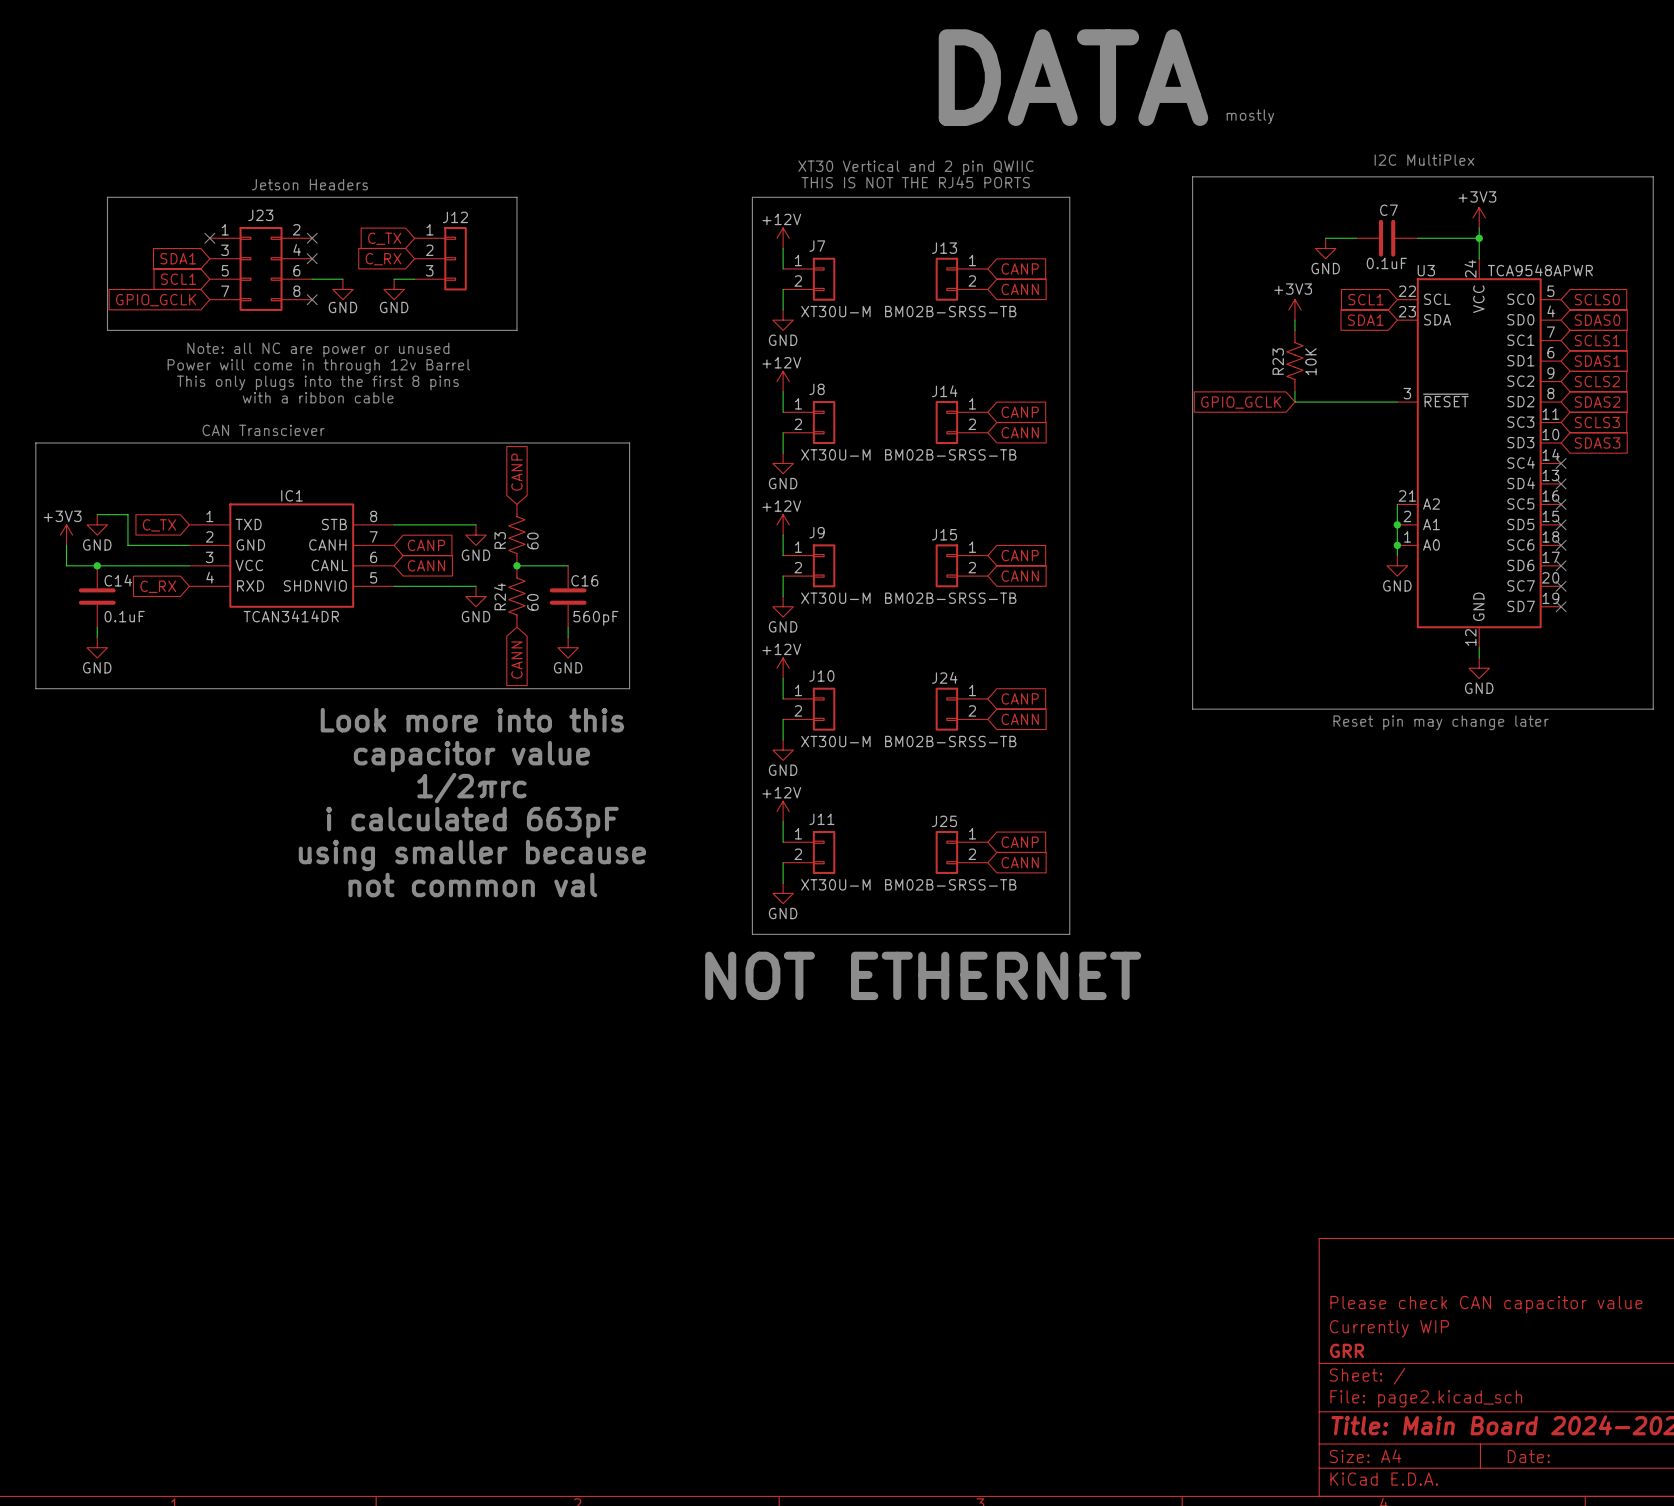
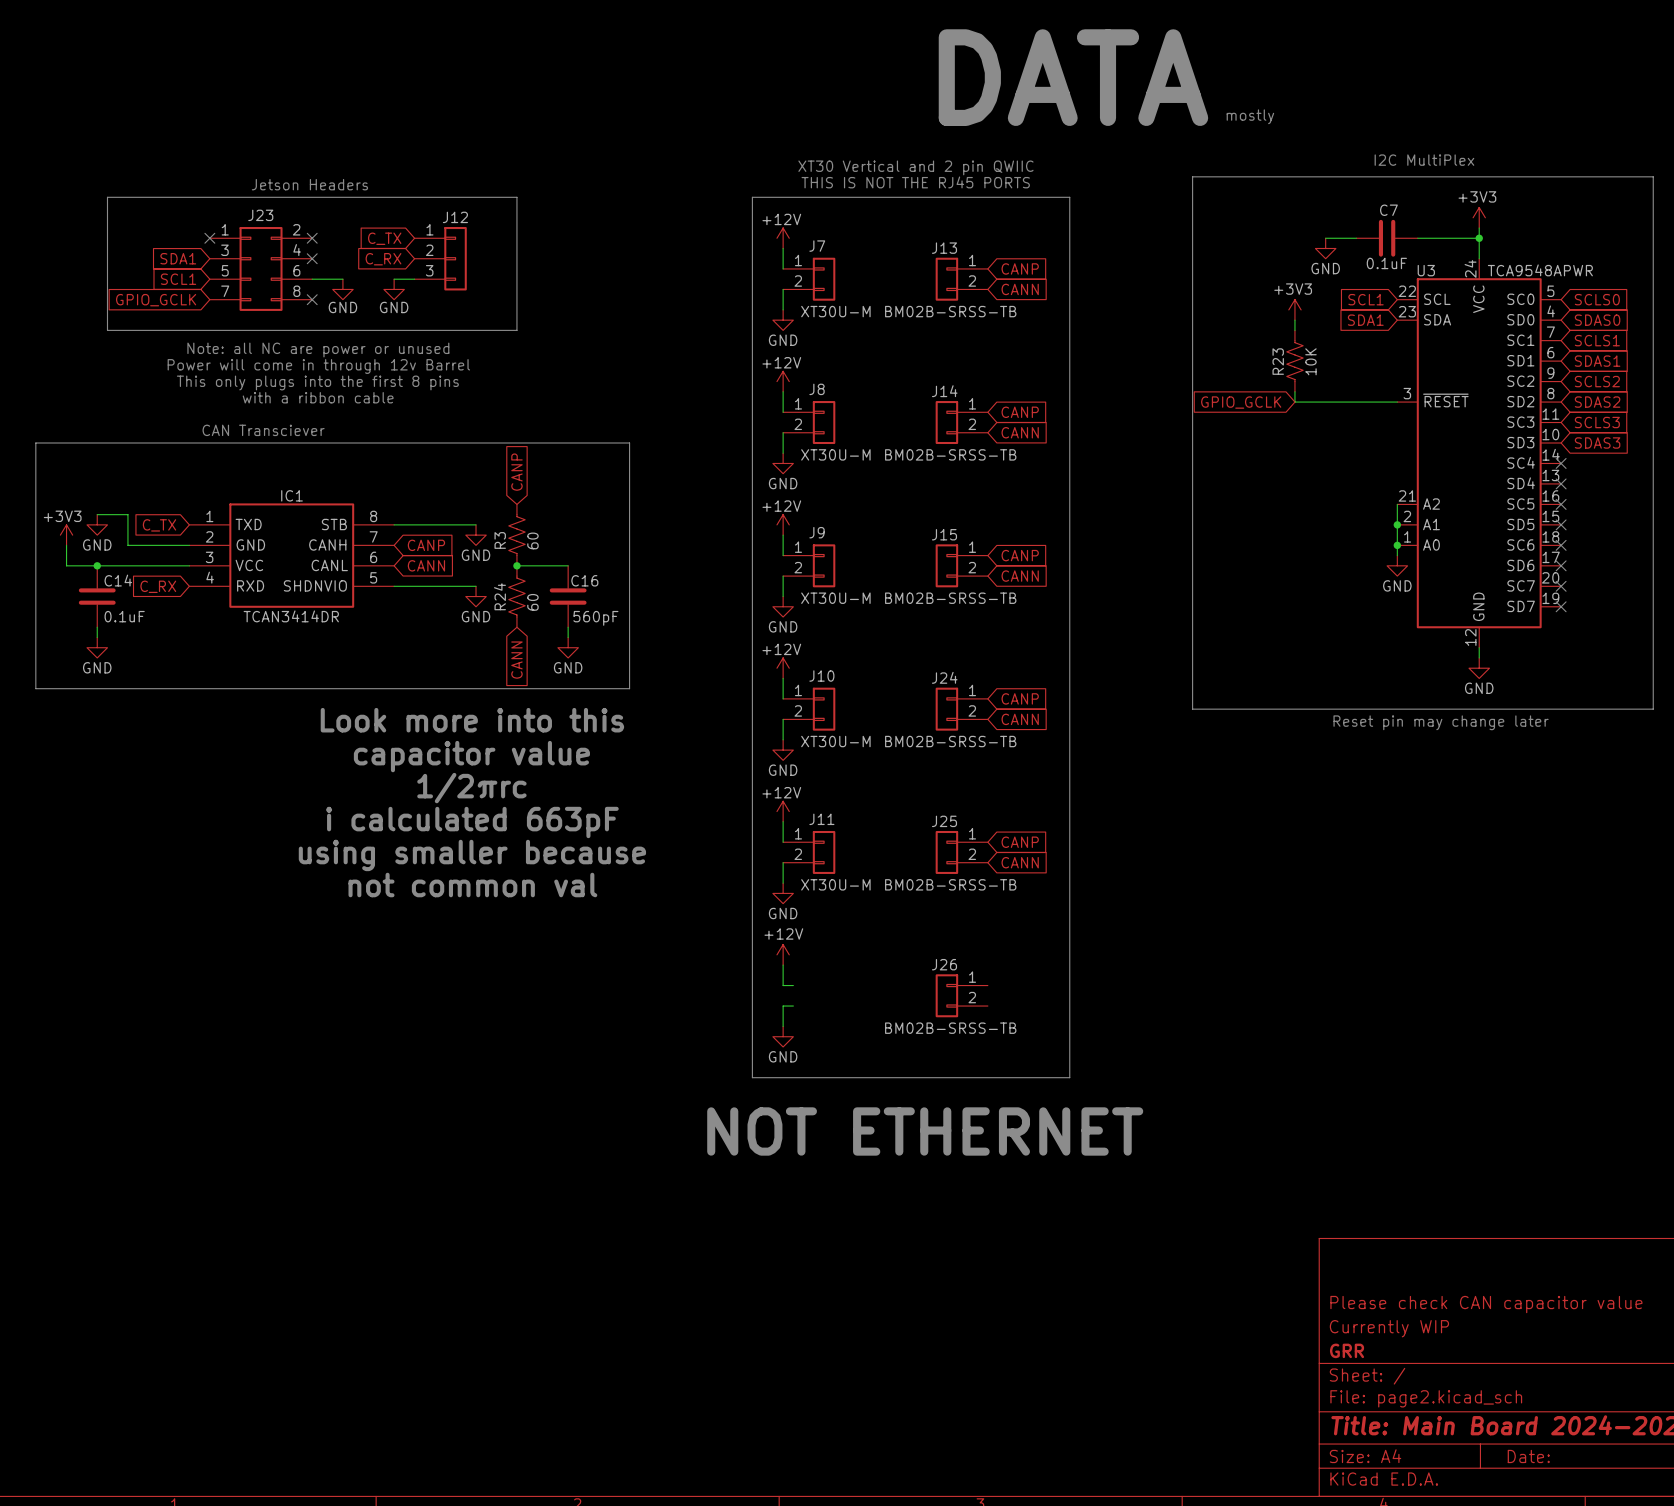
line: (752, 934) (1069, 934) -> (752, 934) (752, 1077) (1069, 1077) (1069, 934)
power symbol: none -> +12V (783, 954)
wire: none -> (783, 965) (783, 985) (793, 985)
text position: NOT ETHERNET (923, 975) -> NOT ETHERNET (925, 1131)
J26: none -> BM02B-SRSS-TB (961, 995)
wire: none -> (793, 1006) (783, 1006) (783, 1026)
power symbol: none -> GND (783, 1036)

